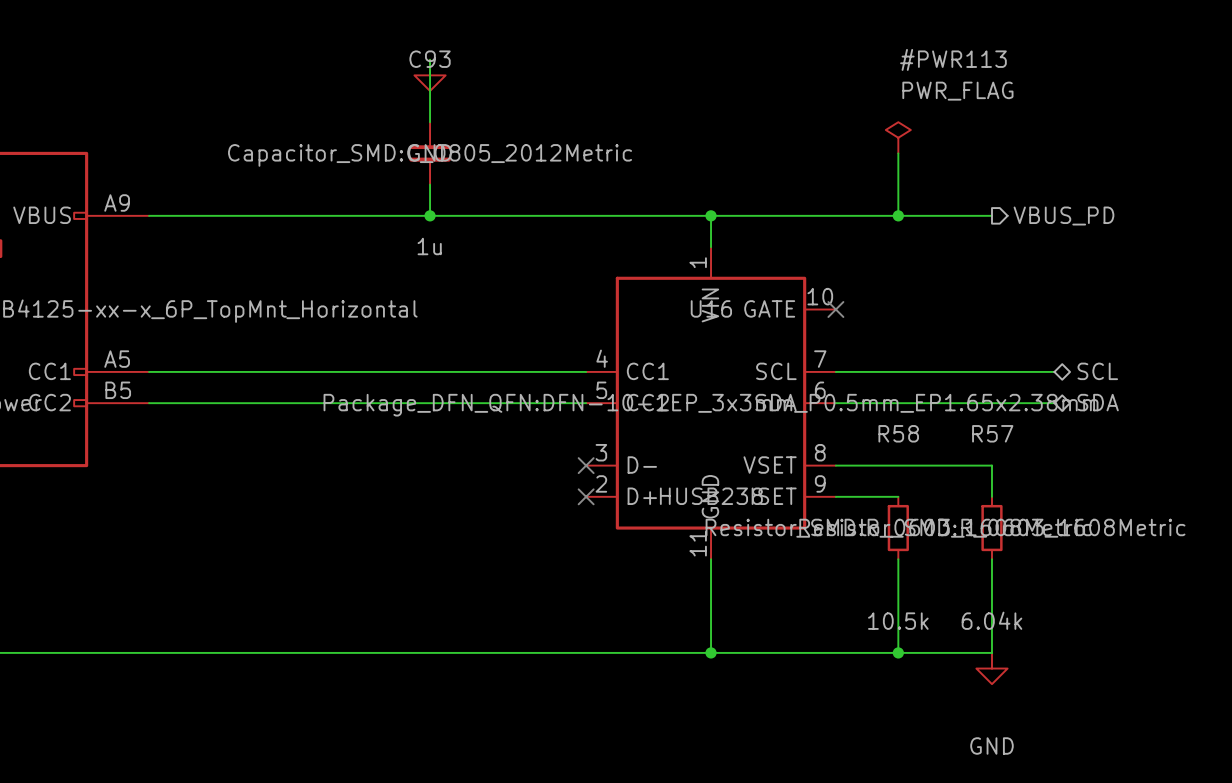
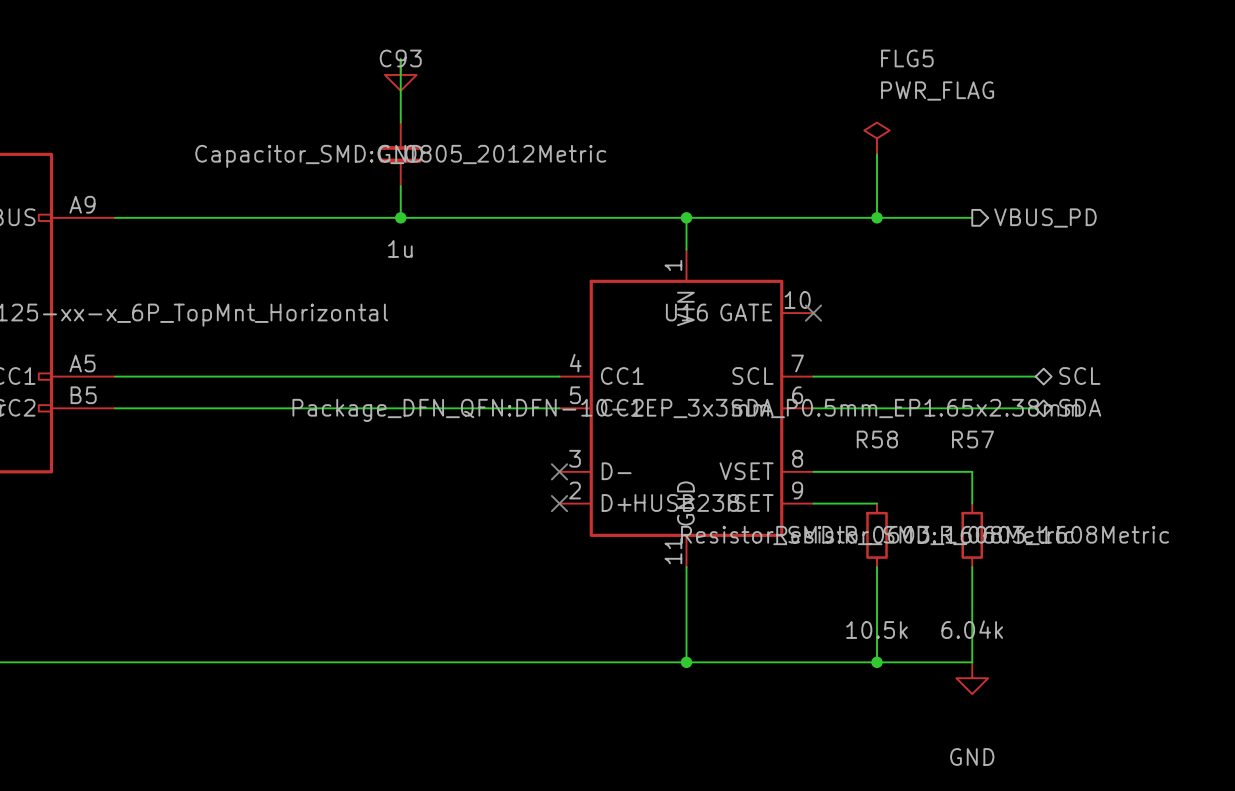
#PWR113 name: #PWR113 (953, 59) -> FLG5 (907, 58)

